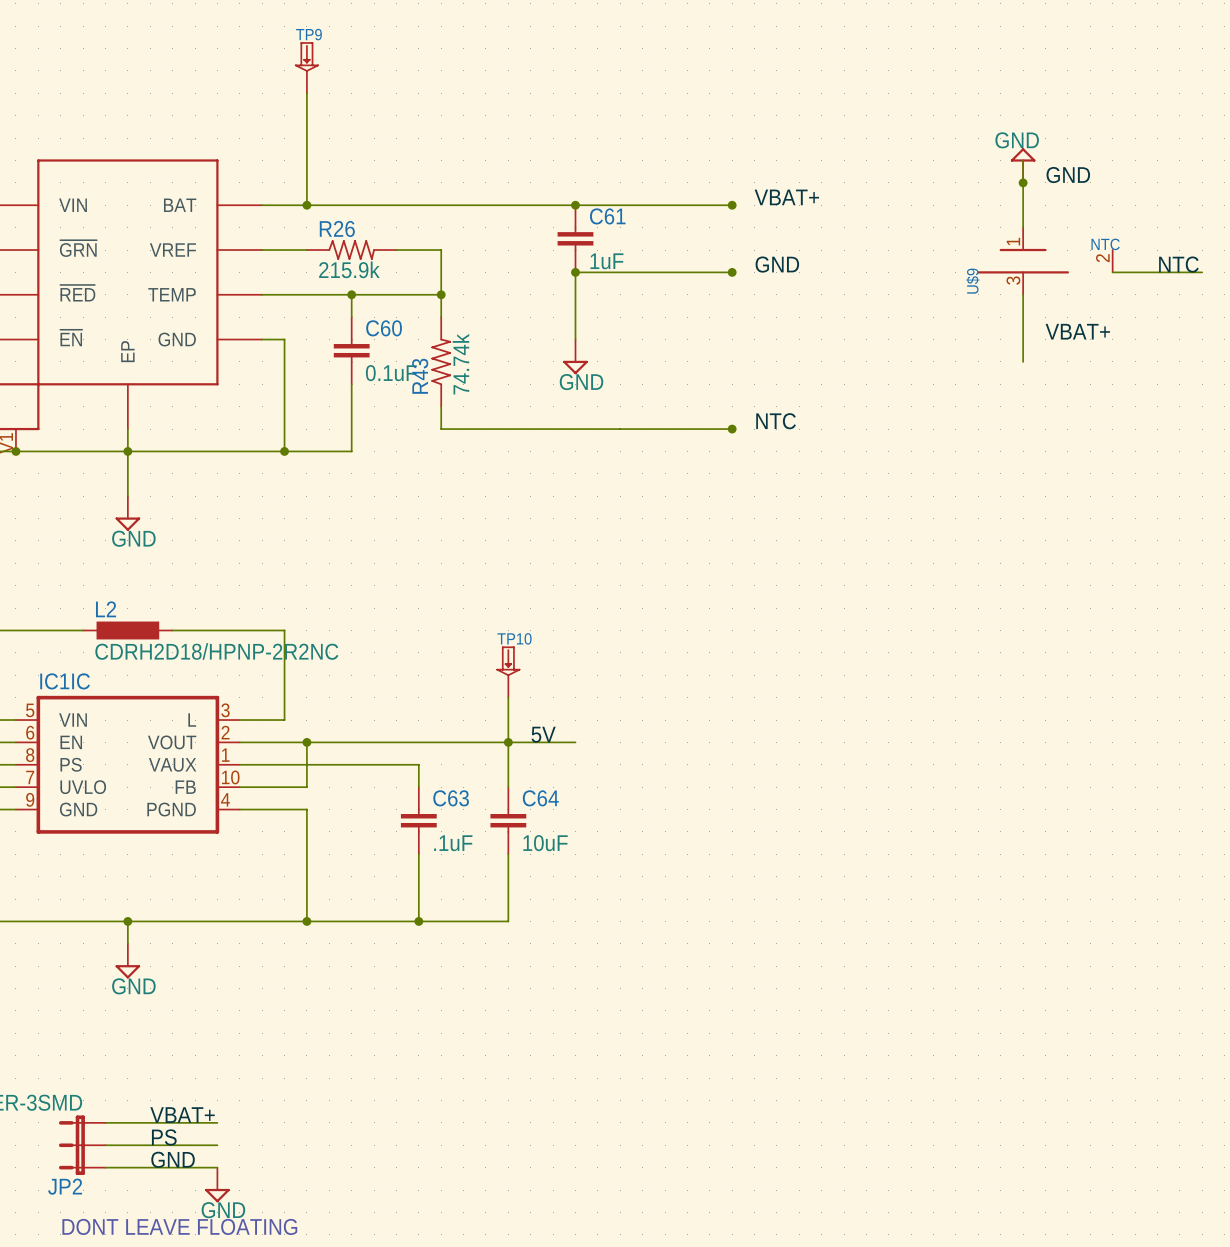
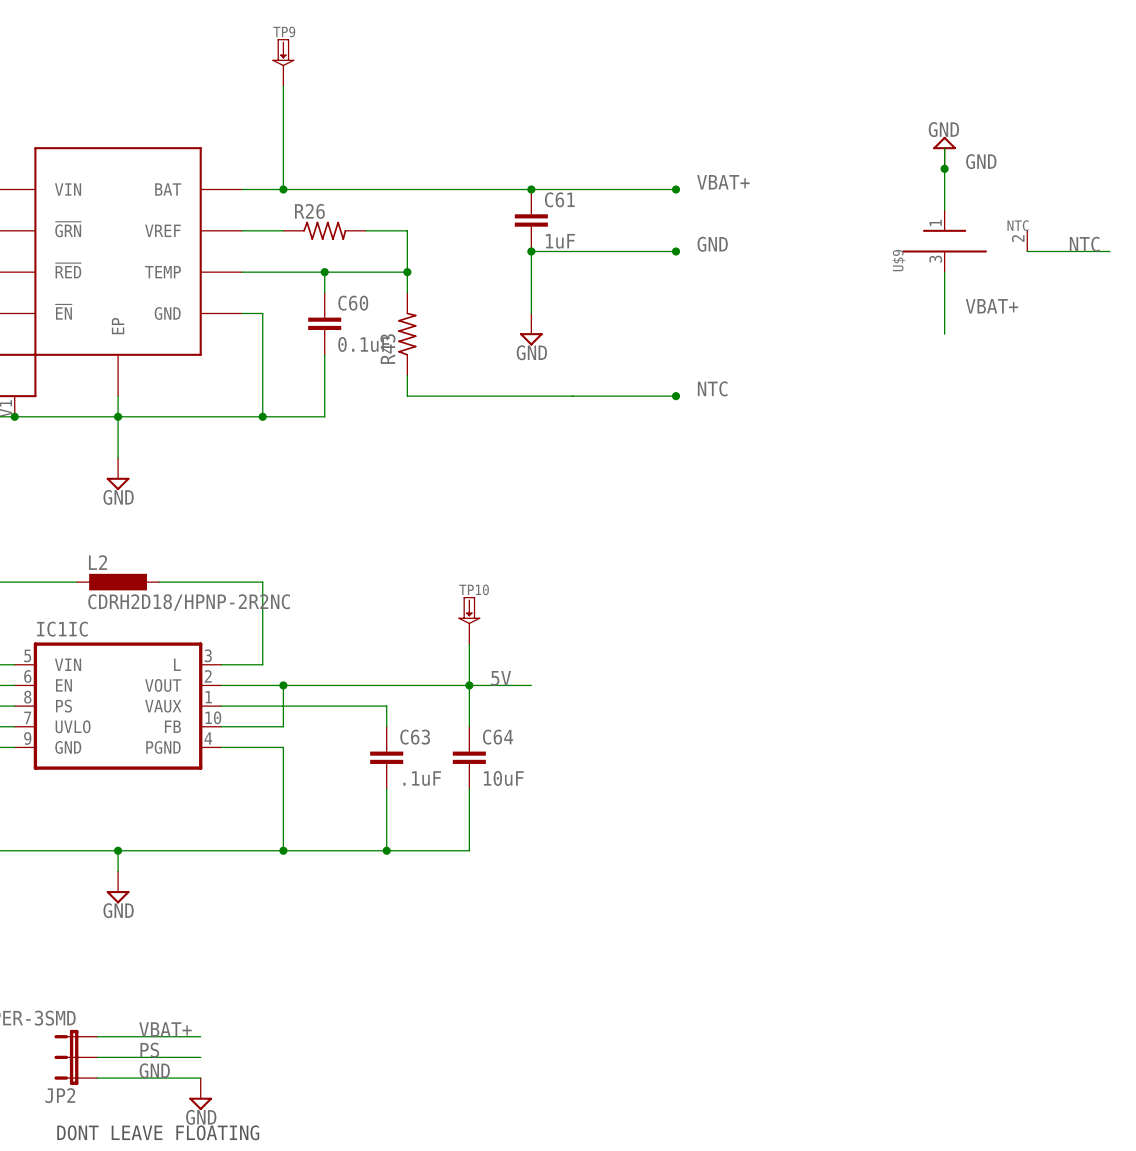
R26 value: 215.9k (349, 269) -> none
R43 value: 74.74k (460, 364) -> none

